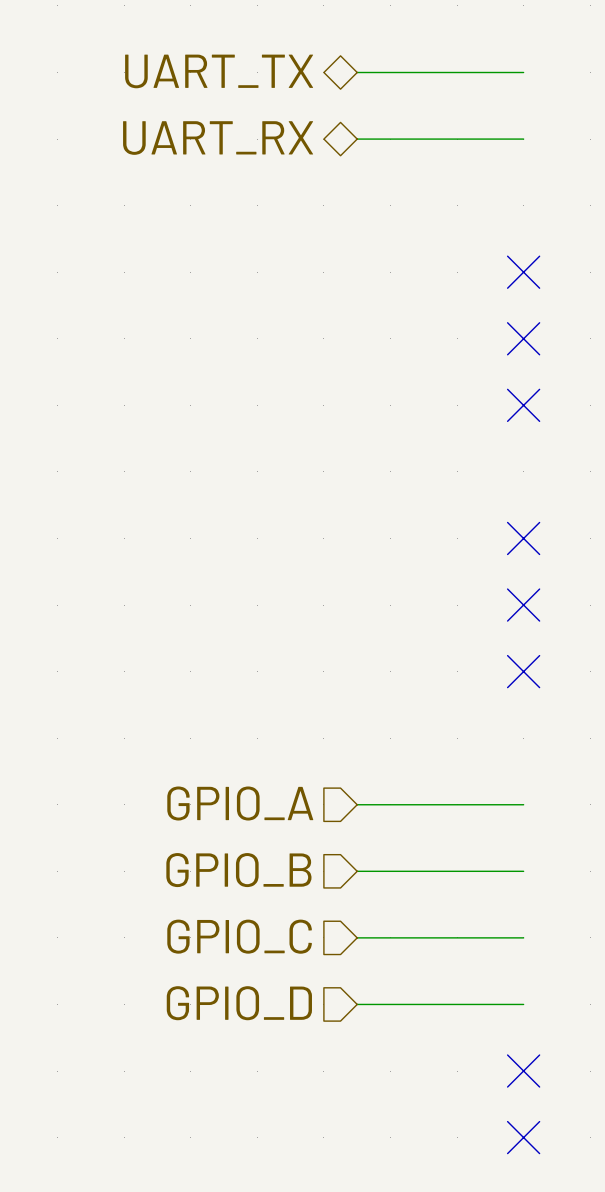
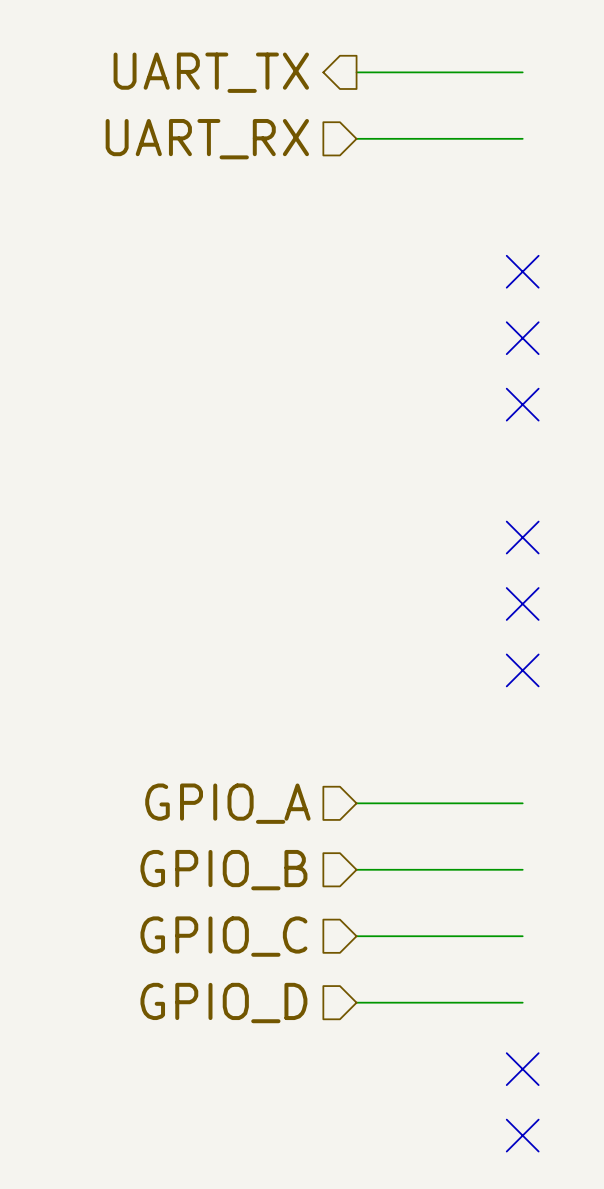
hierarchical label shape: bidirectional (219, 71) -> output (211, 72)
hierarchical label shape: bidirectional (218, 138) -> input (207, 139)

